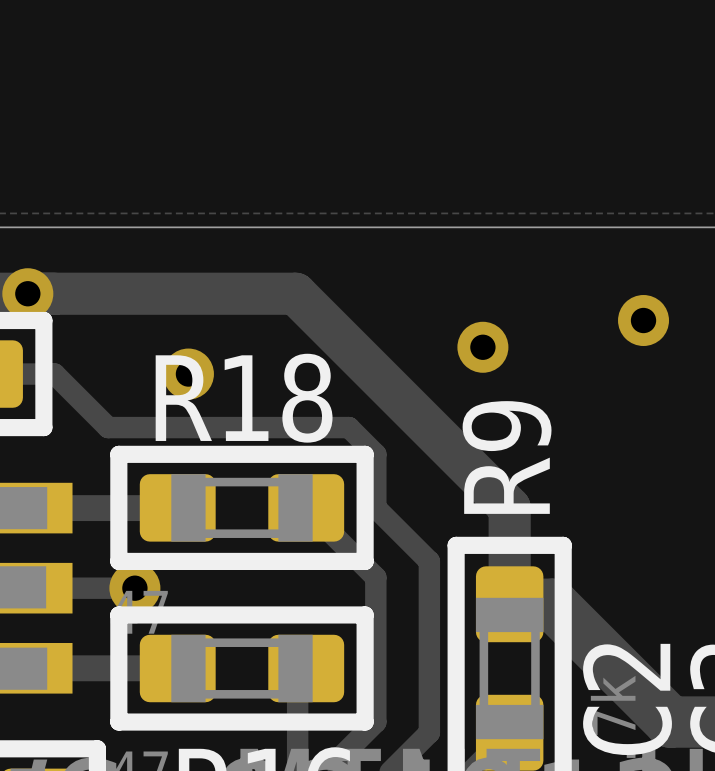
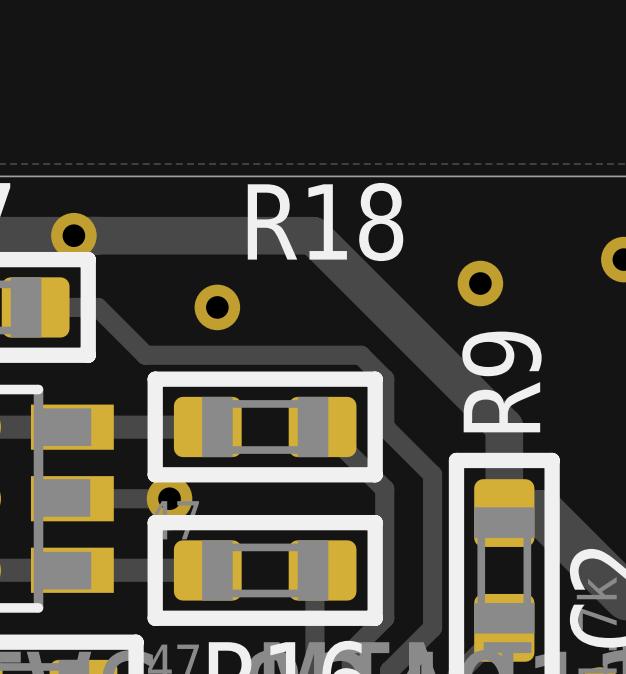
R18 name position: R18 (244, 398) -> R18 (325, 222)

